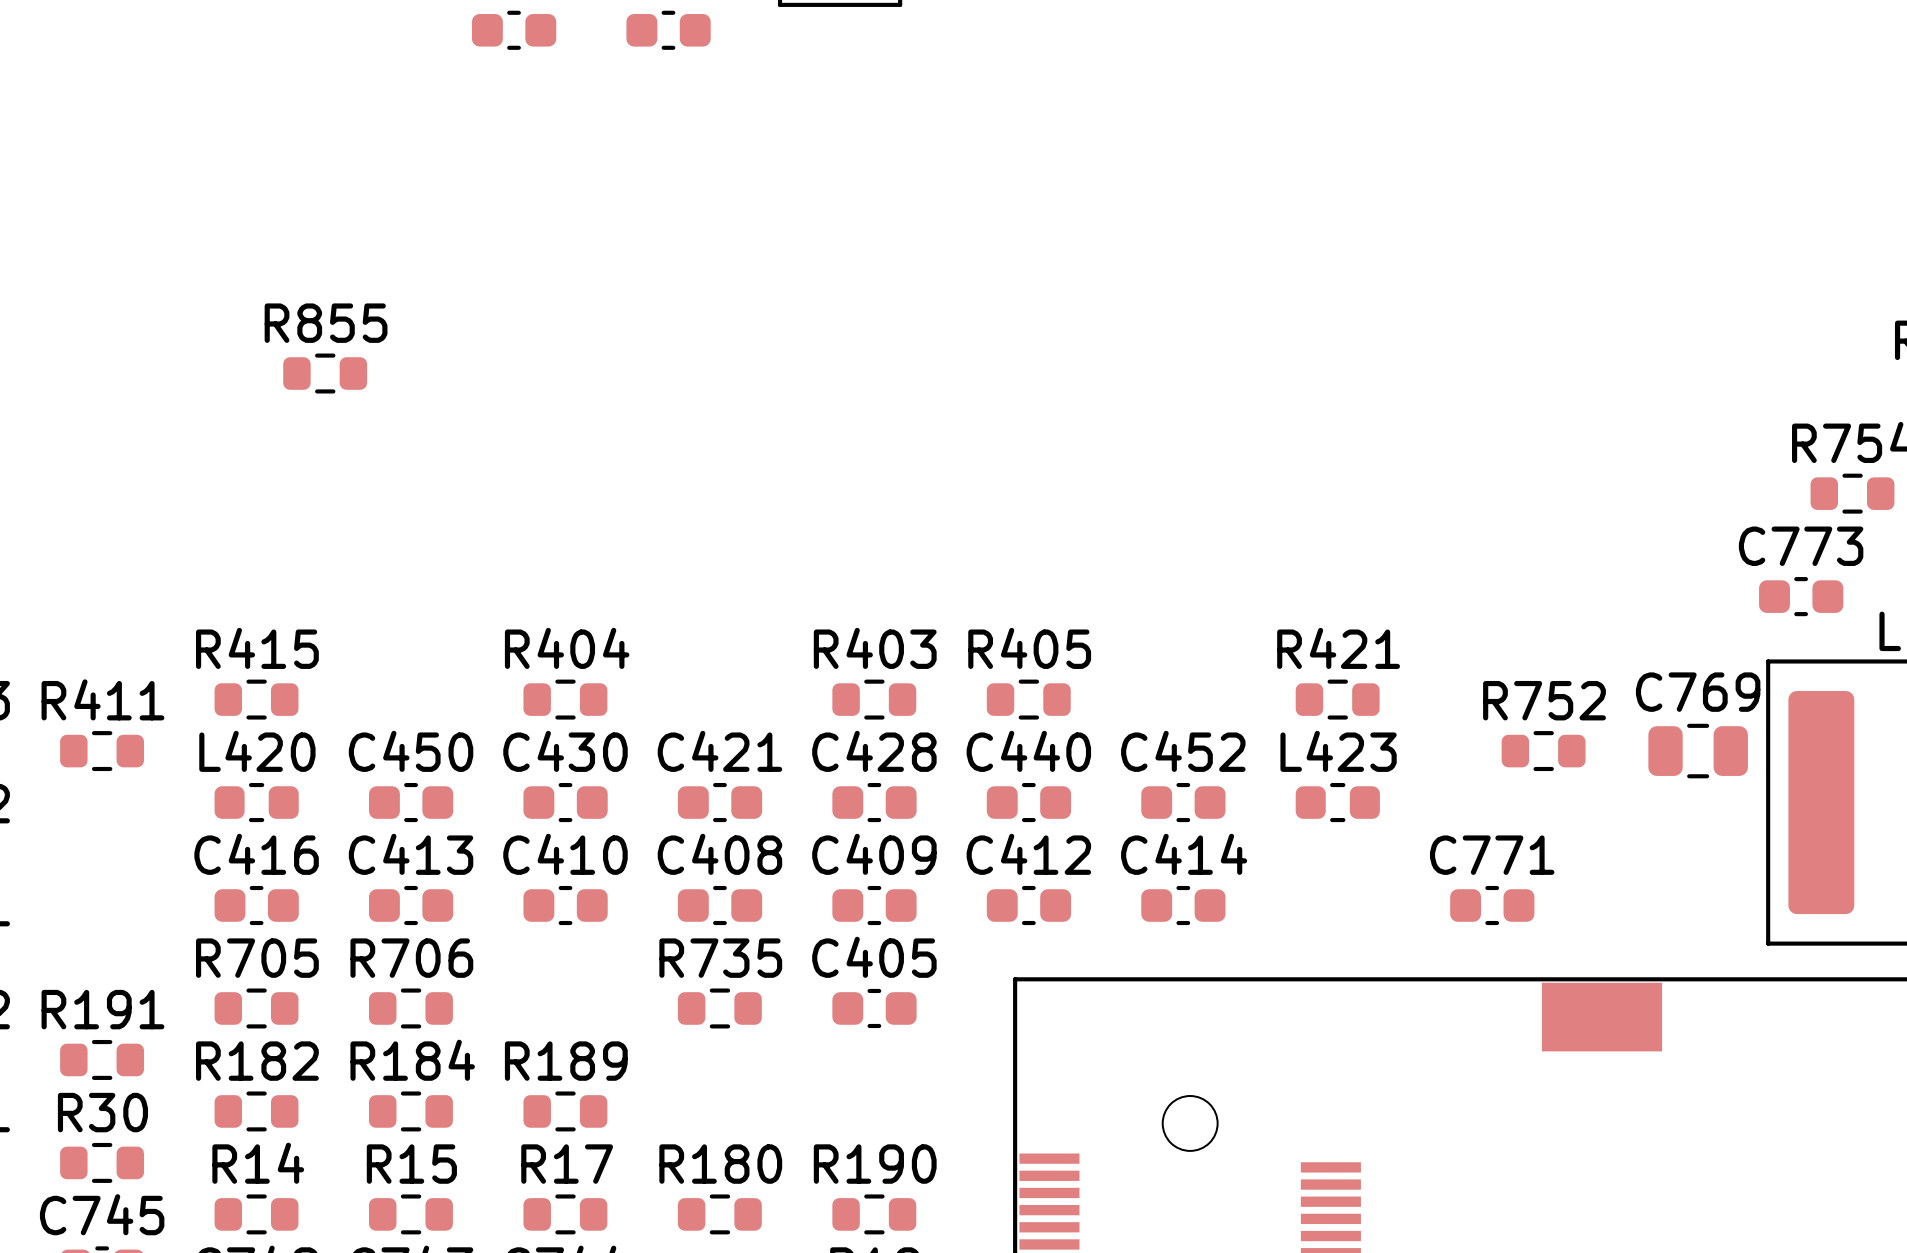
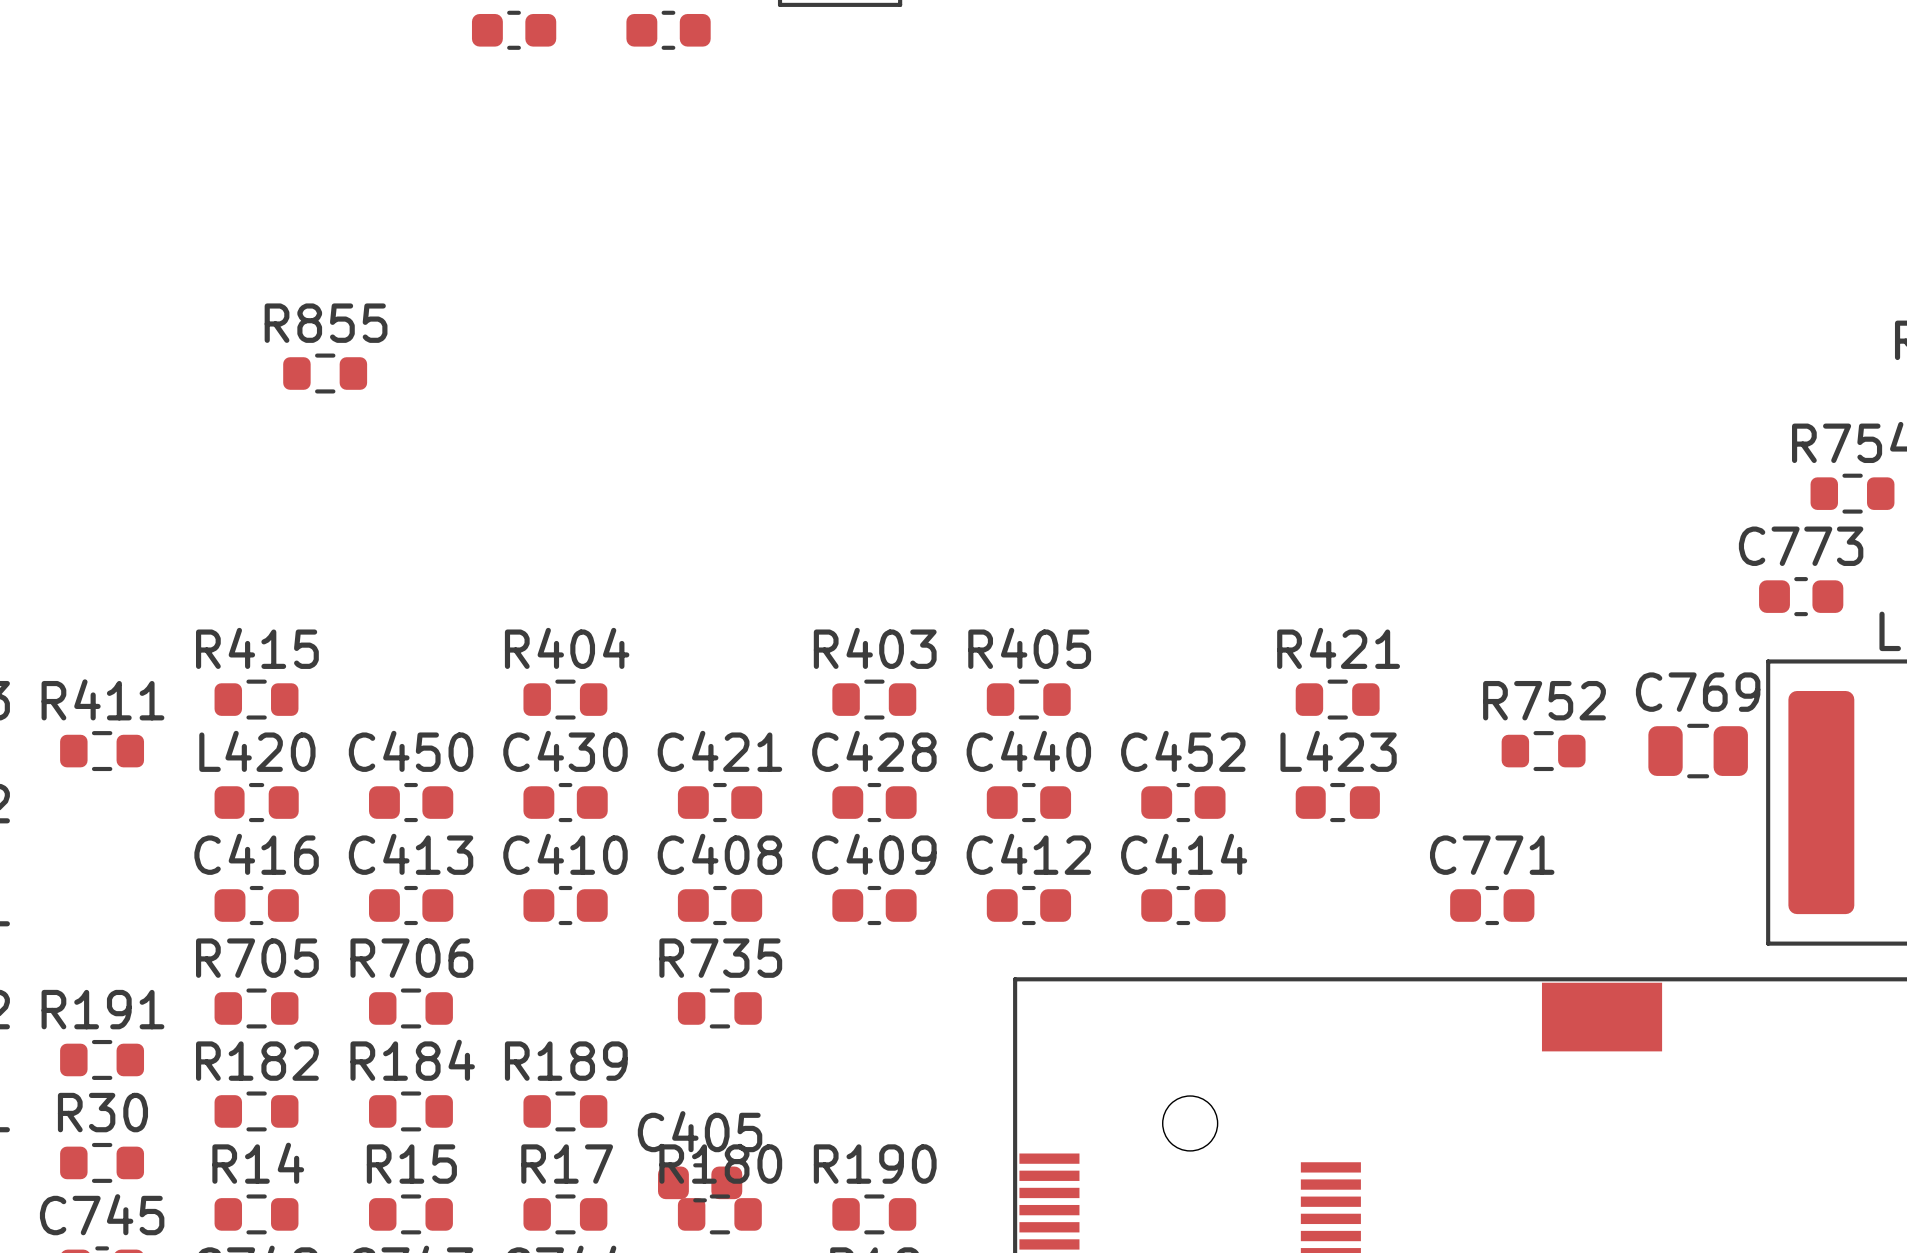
C405 position: (874, 1008) -> (700, 1182)

